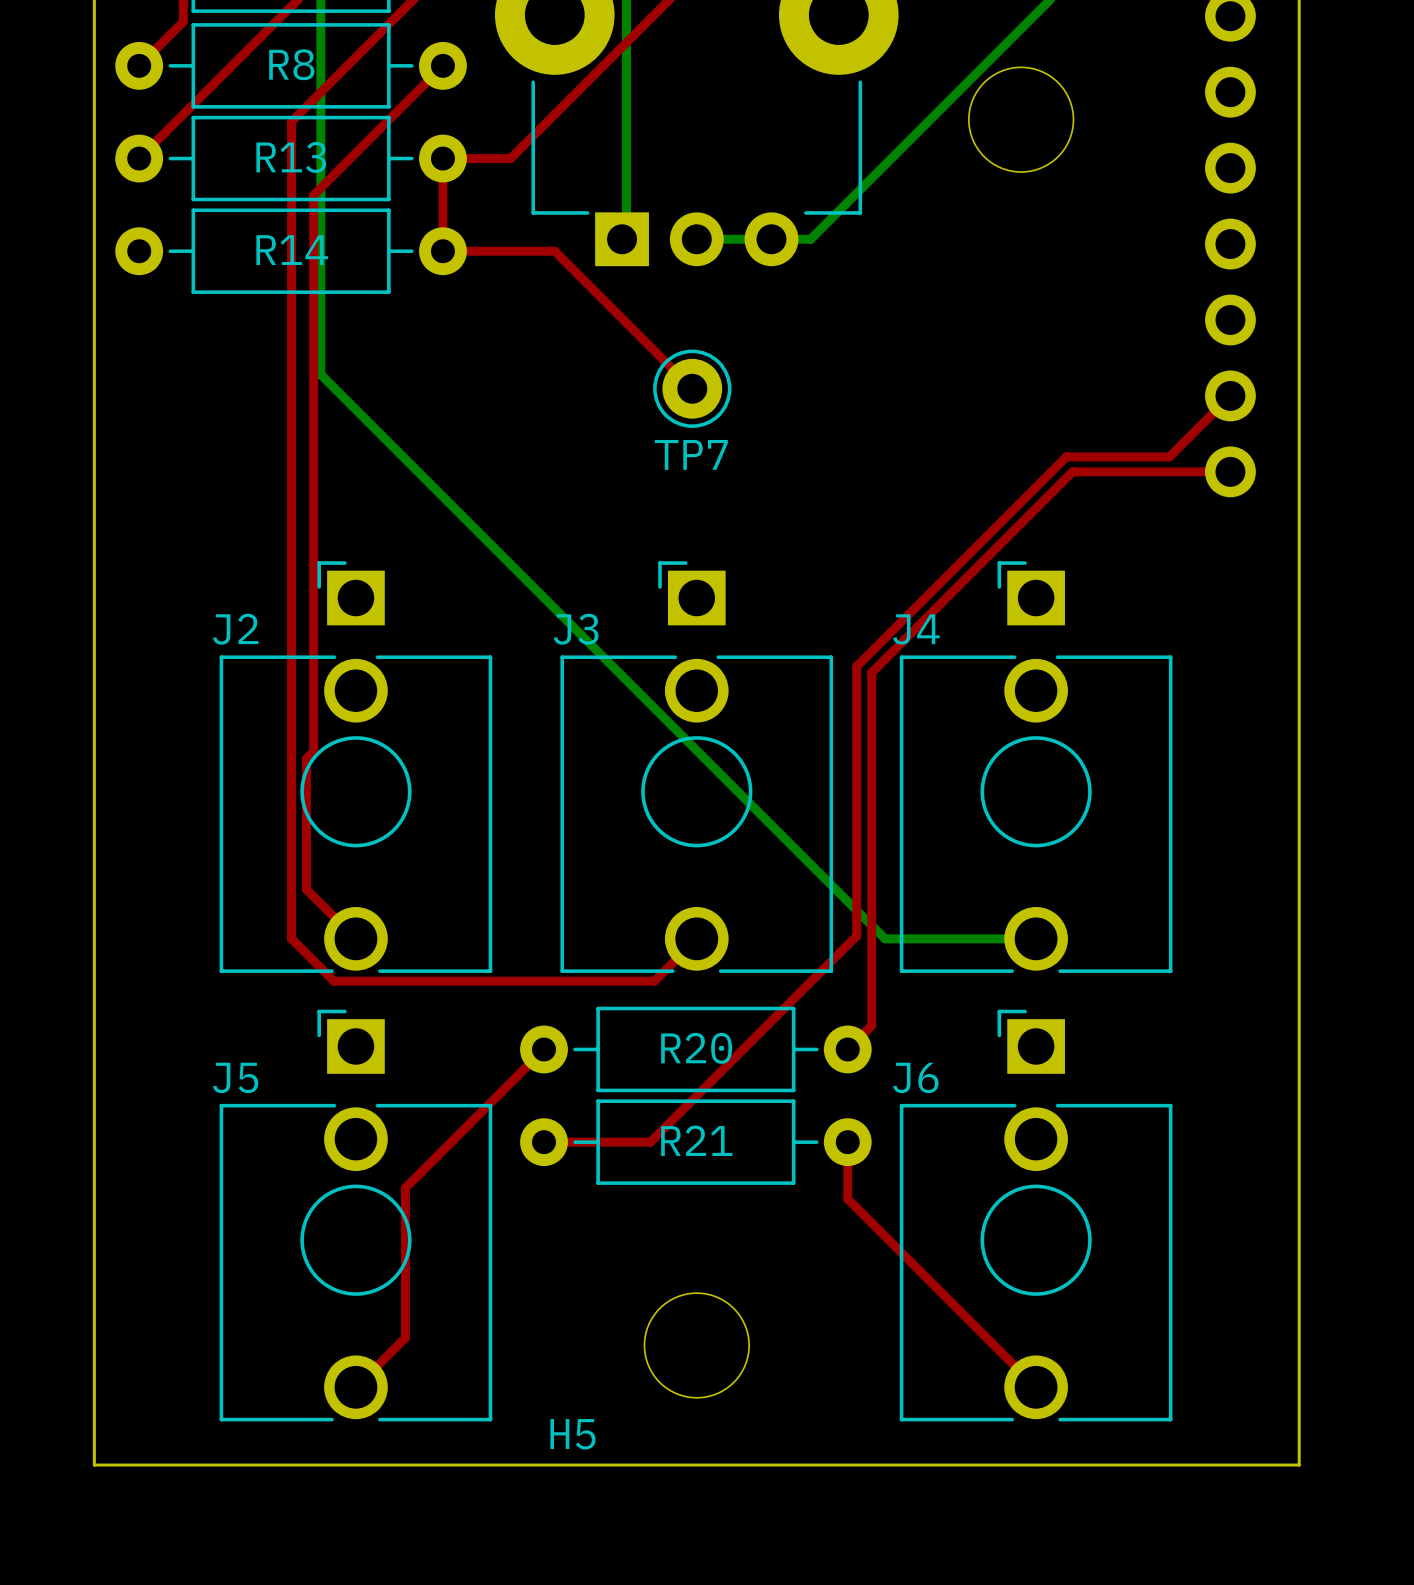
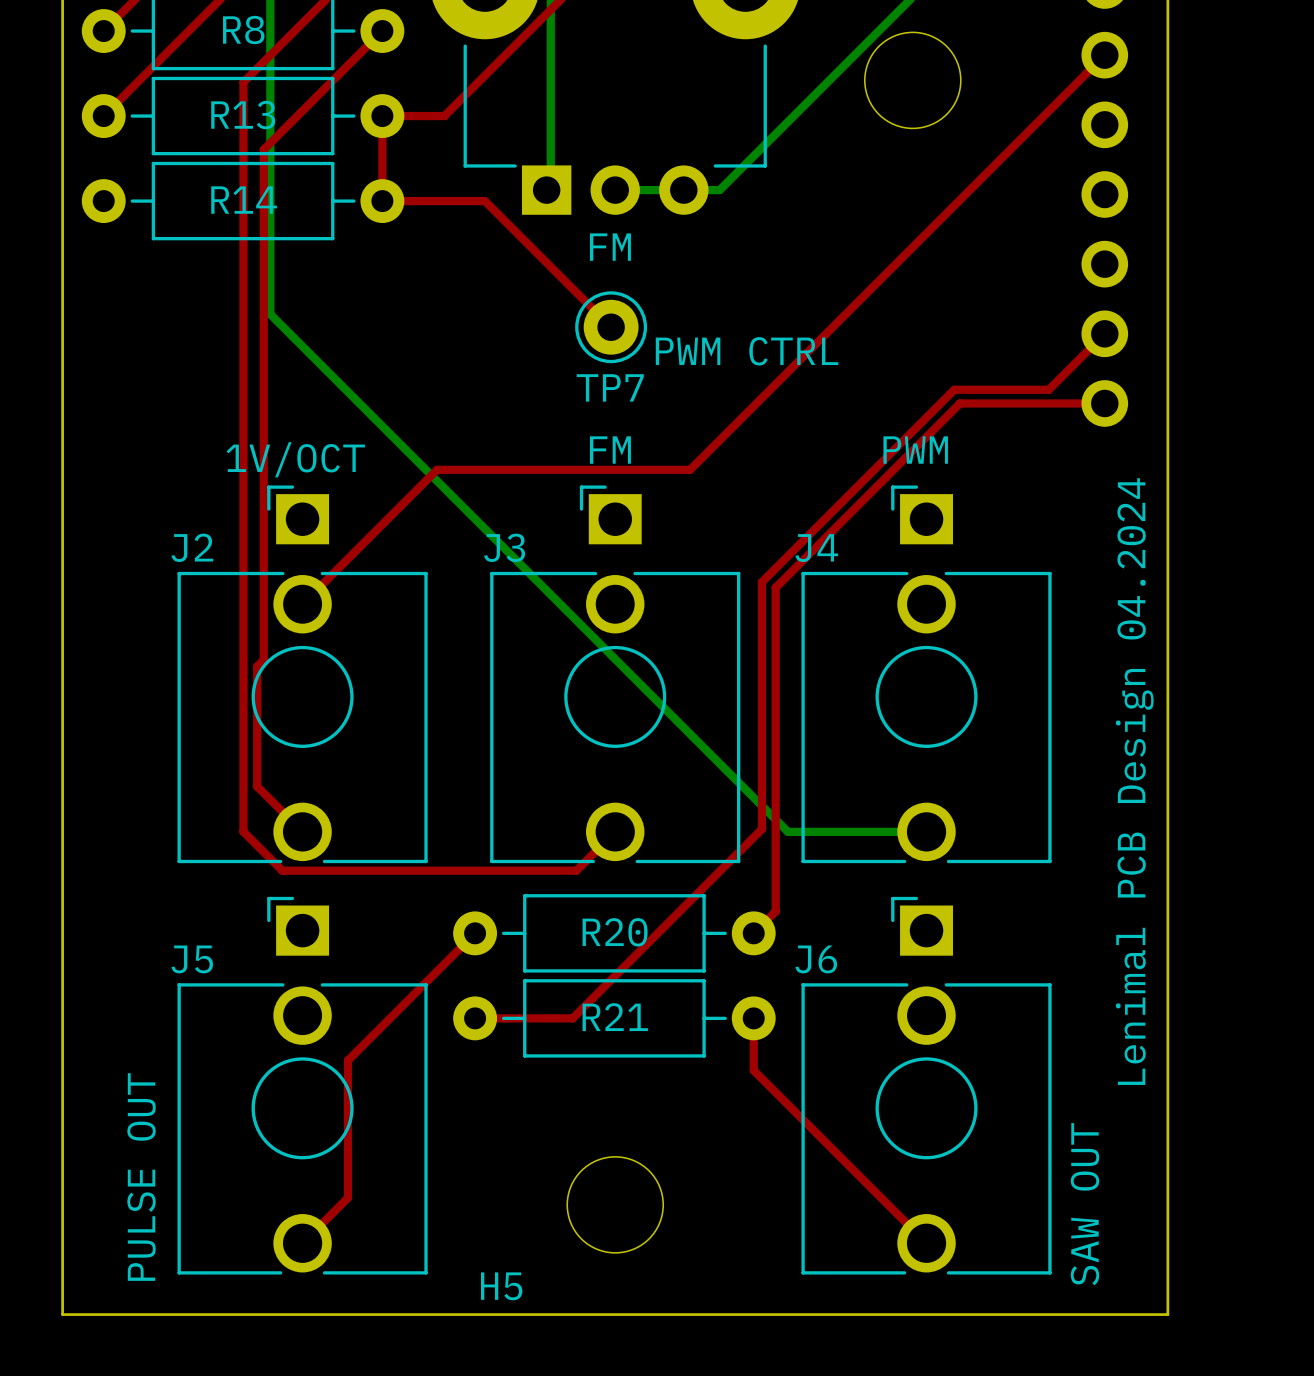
top track: none -> (1104, 55) (690, 469) (436, 469) (302, 604)
text: none -> FM (610, 247)
text: none -> PWM CTRL (747, 351)
text: none -> FM (610, 450)
text: none -> PWM (915, 450)
text: none -> 1V/OCT (295, 459)
text: none -> Lenimal PCB Design 04.2024 (1134, 781)
text: none -> PULSE OUT (141, 1177)
text: none -> SAW OUT (1084, 1204)

